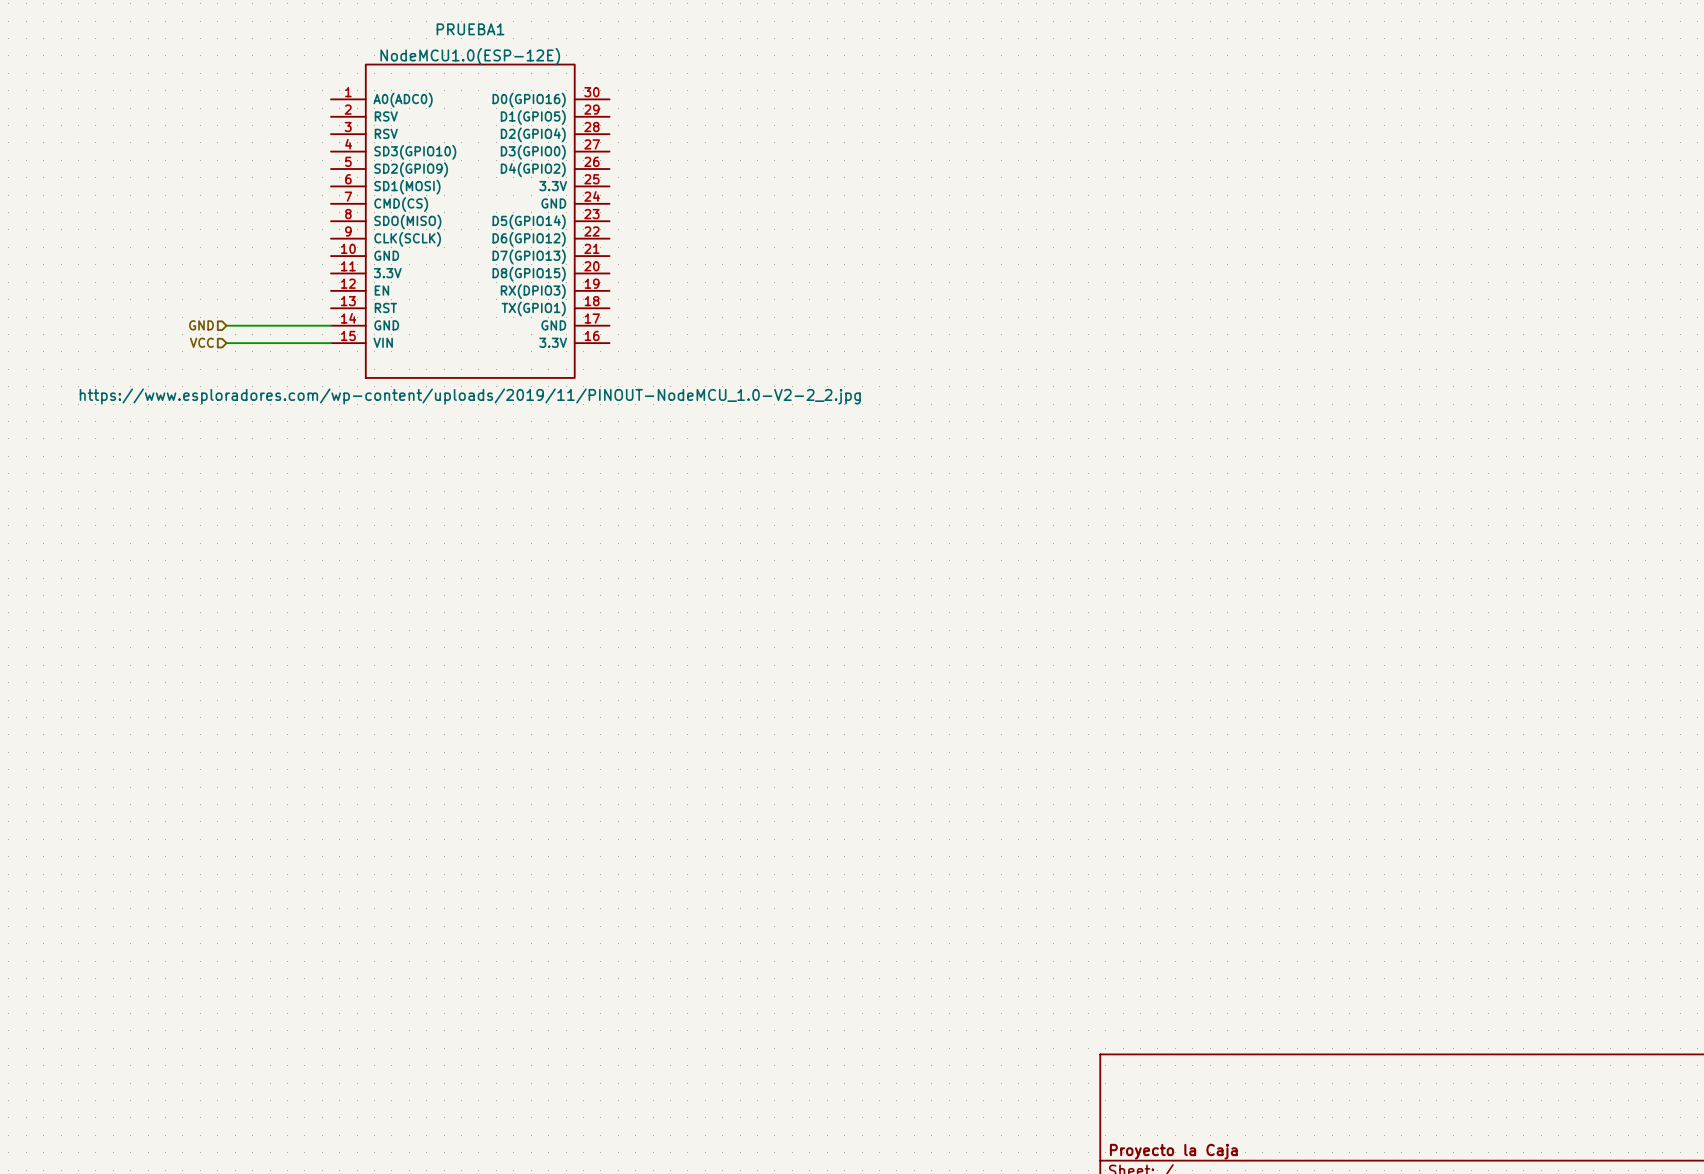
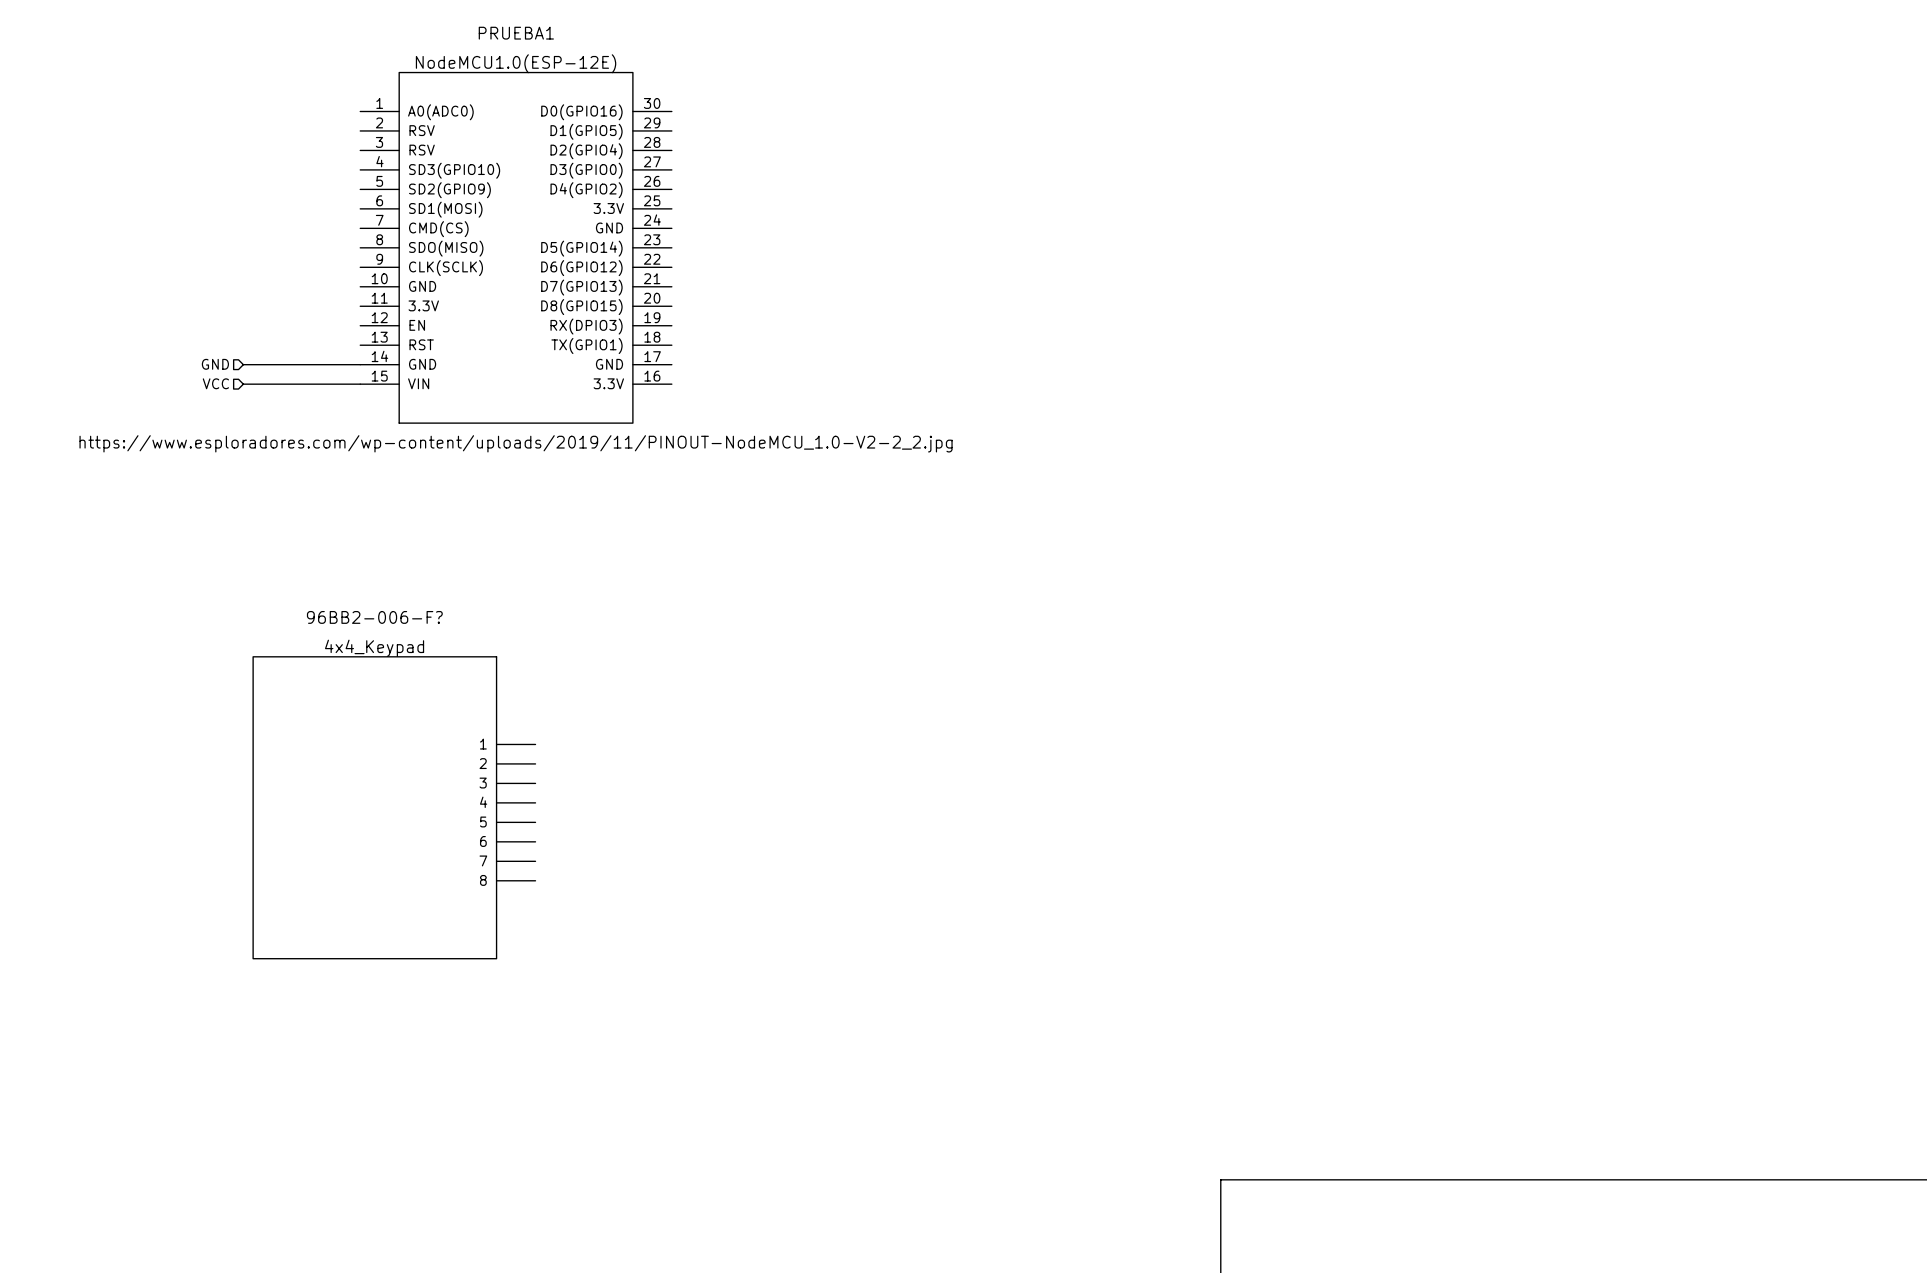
96BB2-006-F?: none -> 4x4_Keypad (394, 807)

